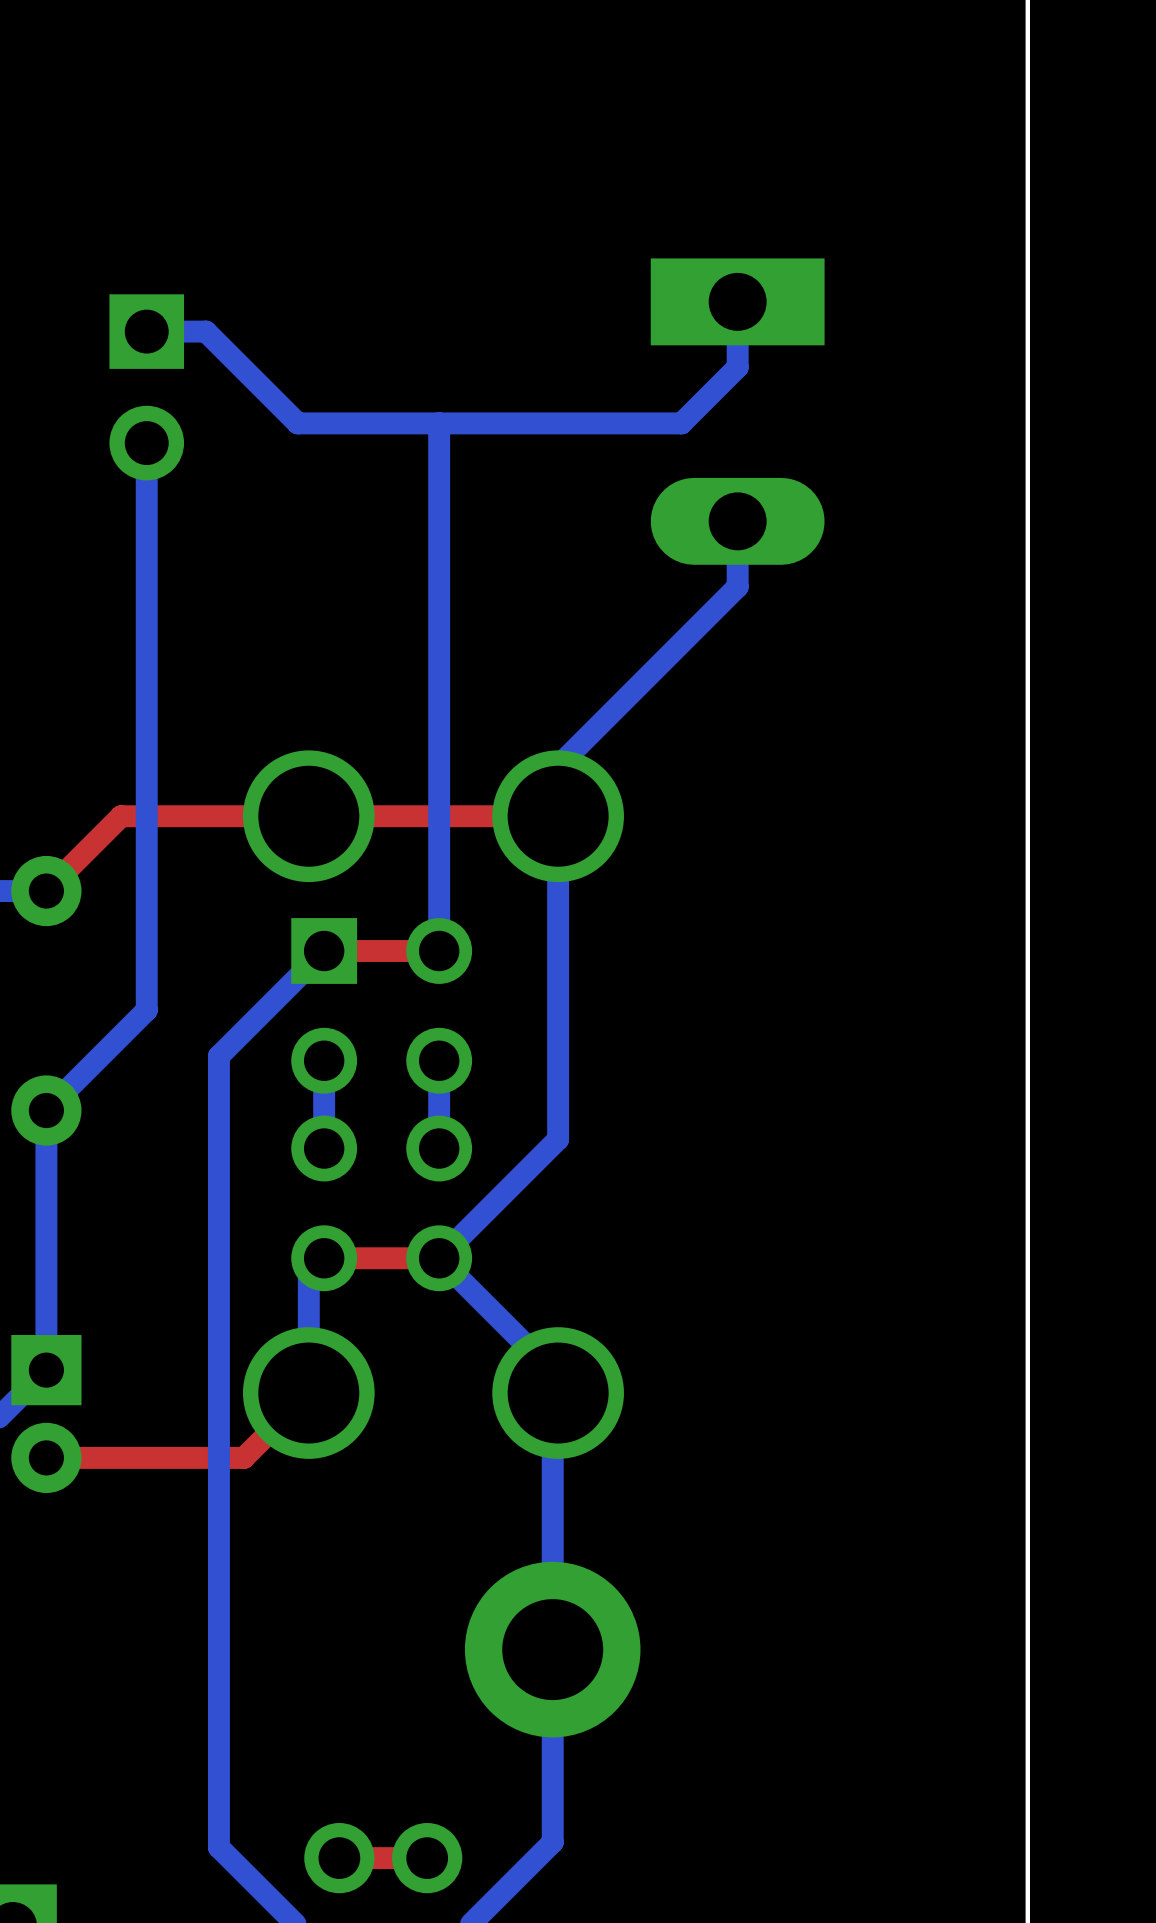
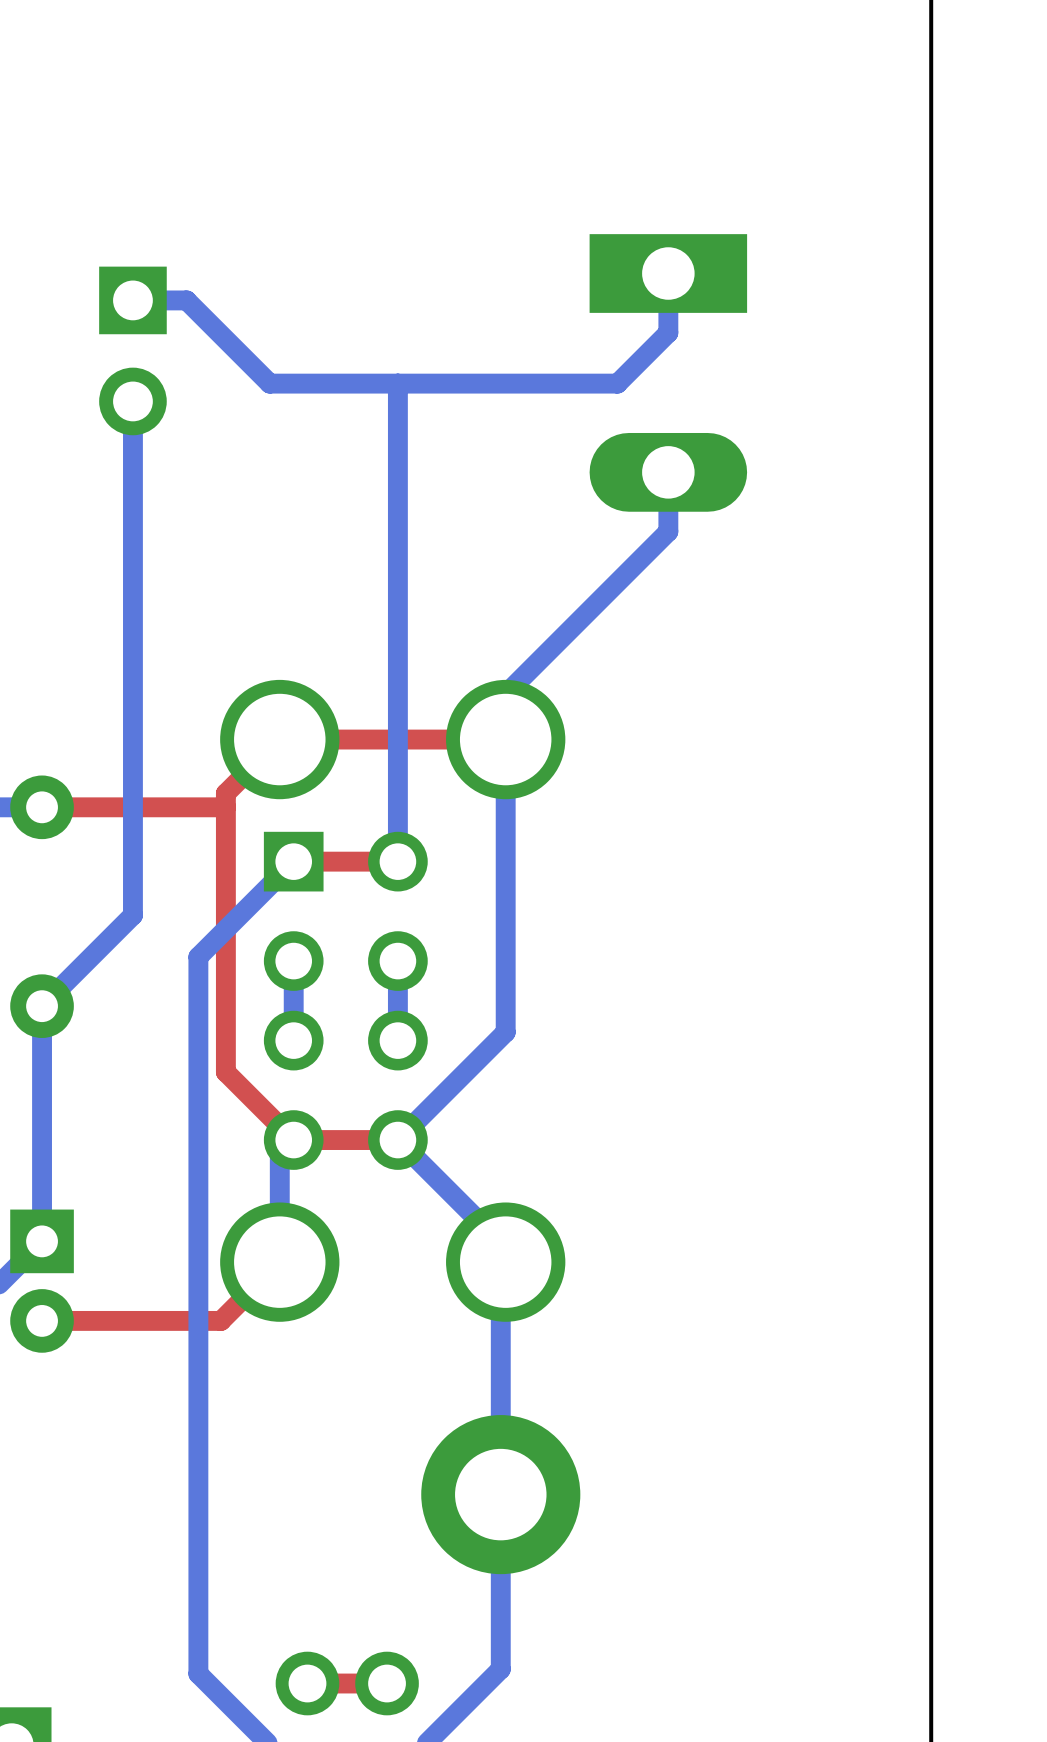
top track: (308, 816) (121, 816) (46, 891) -> (225, 807) (42, 807)
top track: none -> (279, 739) (225, 793) (225, 1072) (293, 1140)

